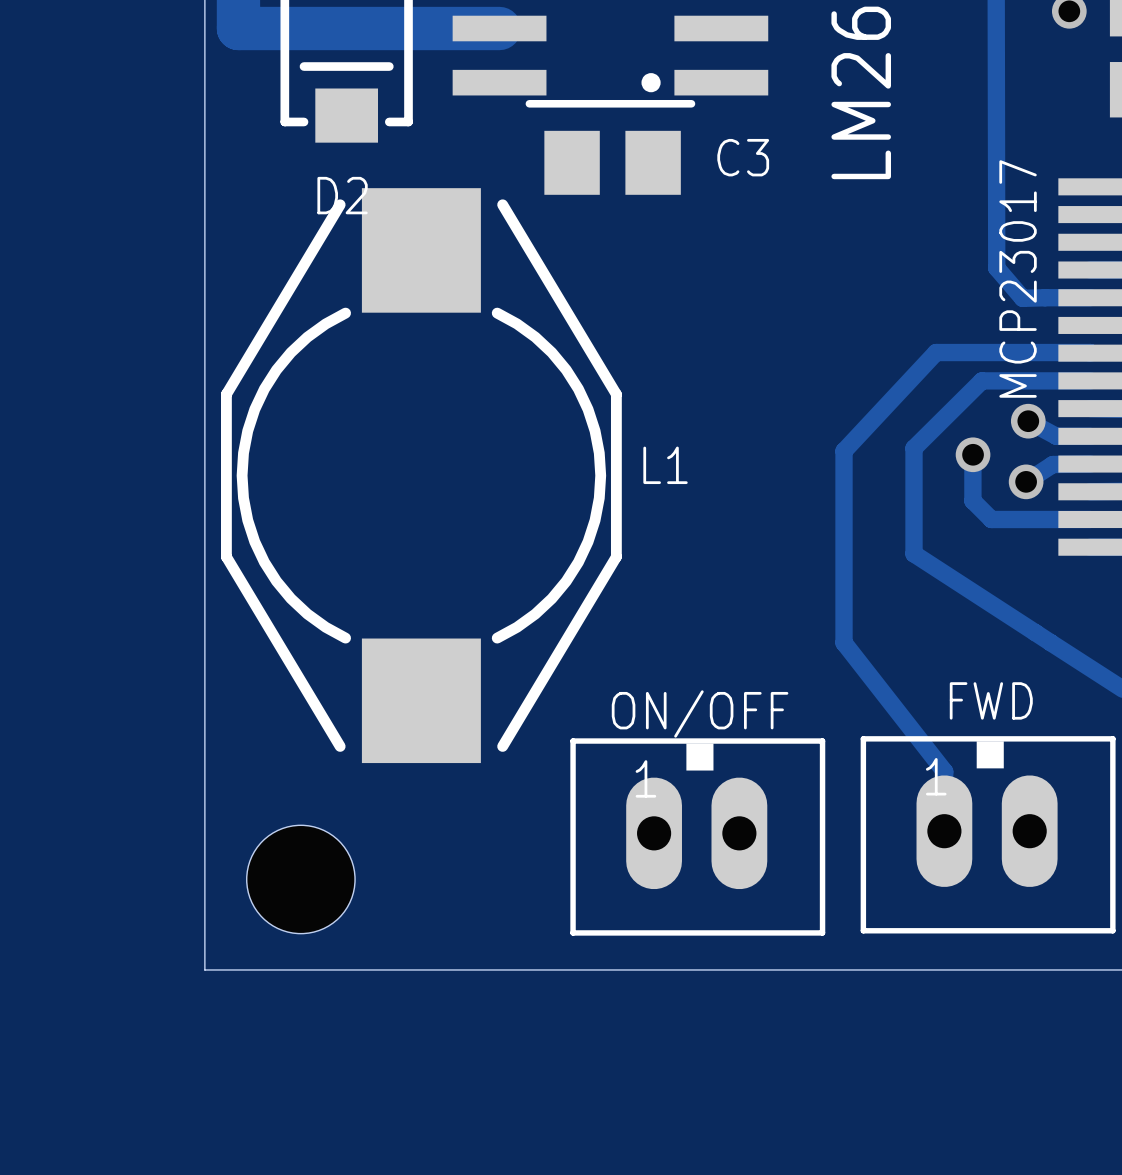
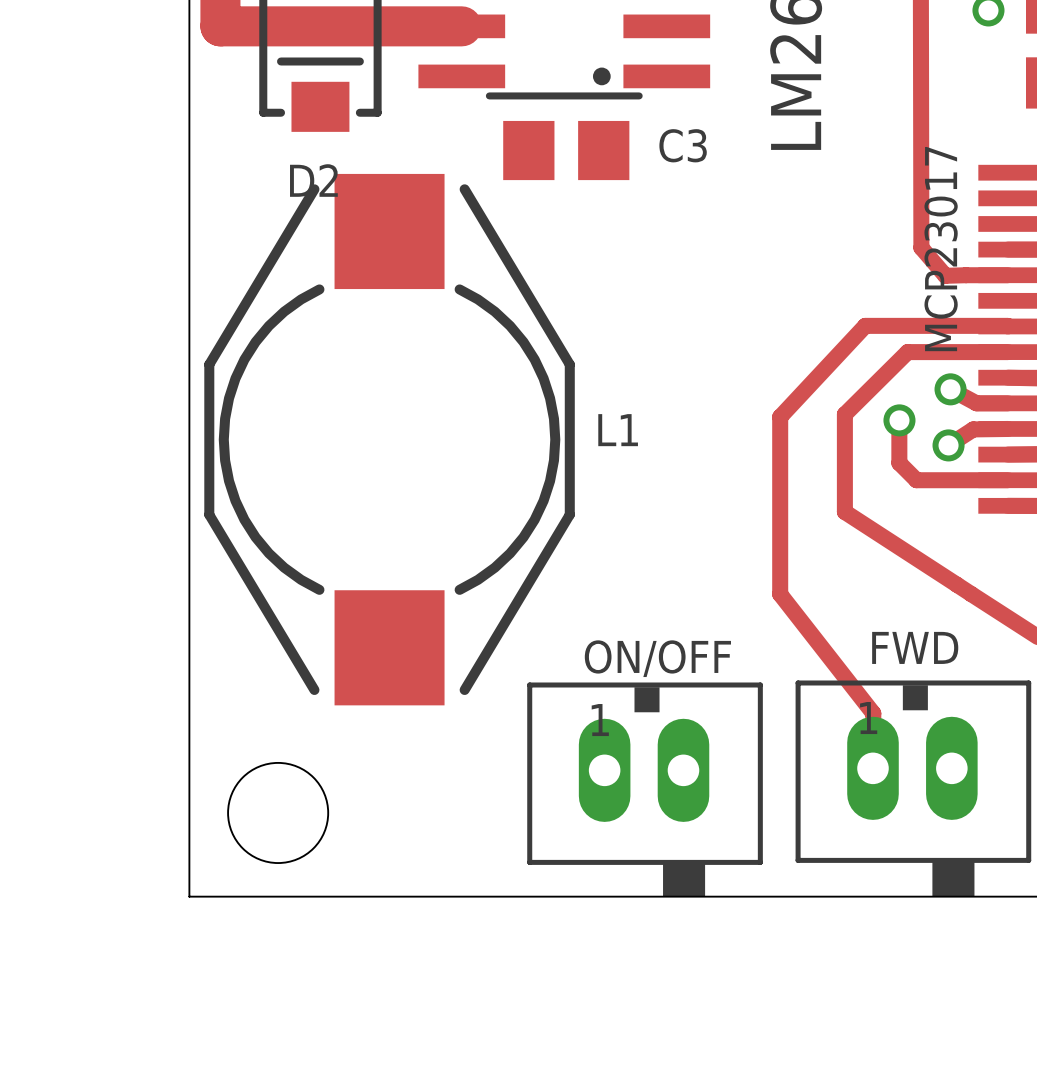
drawing: none -> [932, 859, 975, 897]
drawing: none -> [663, 860, 706, 897]

